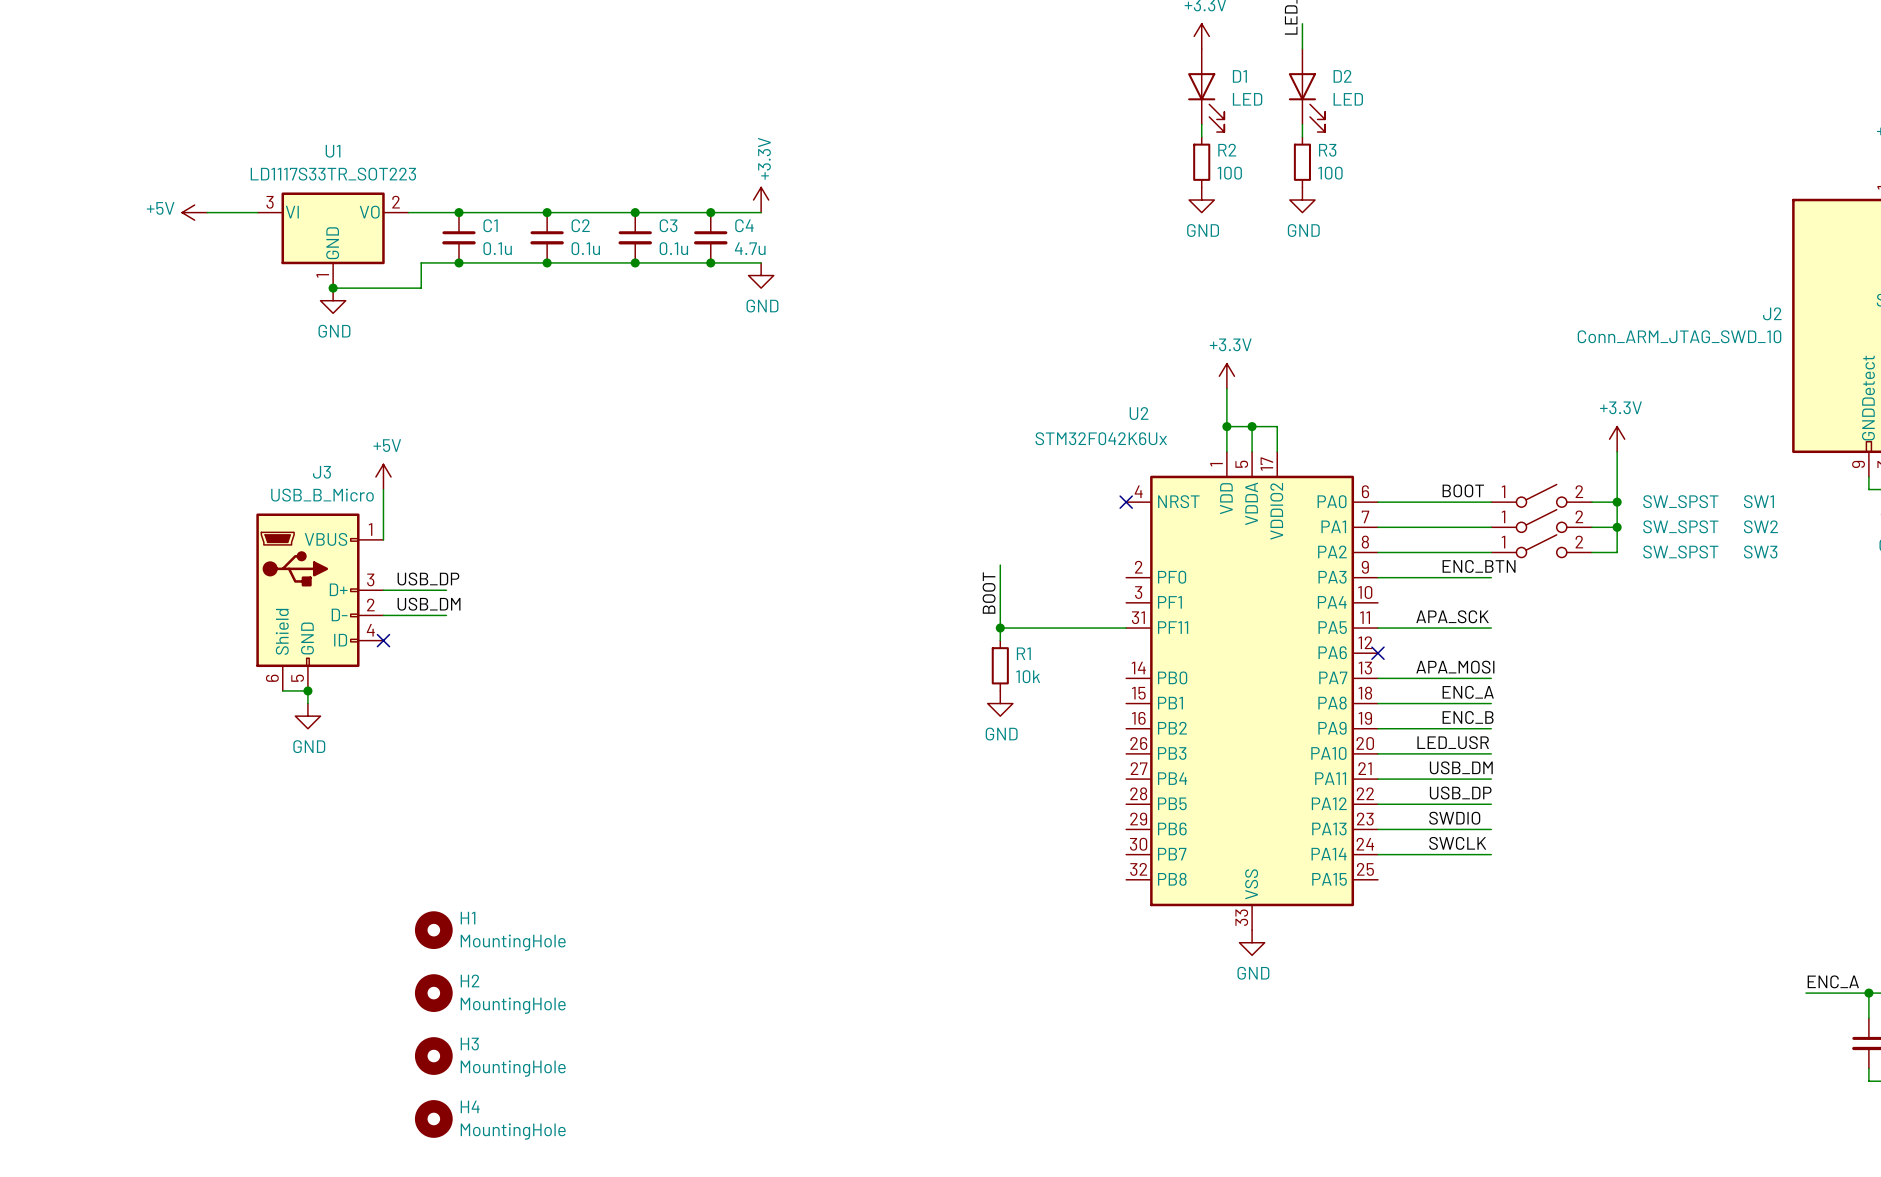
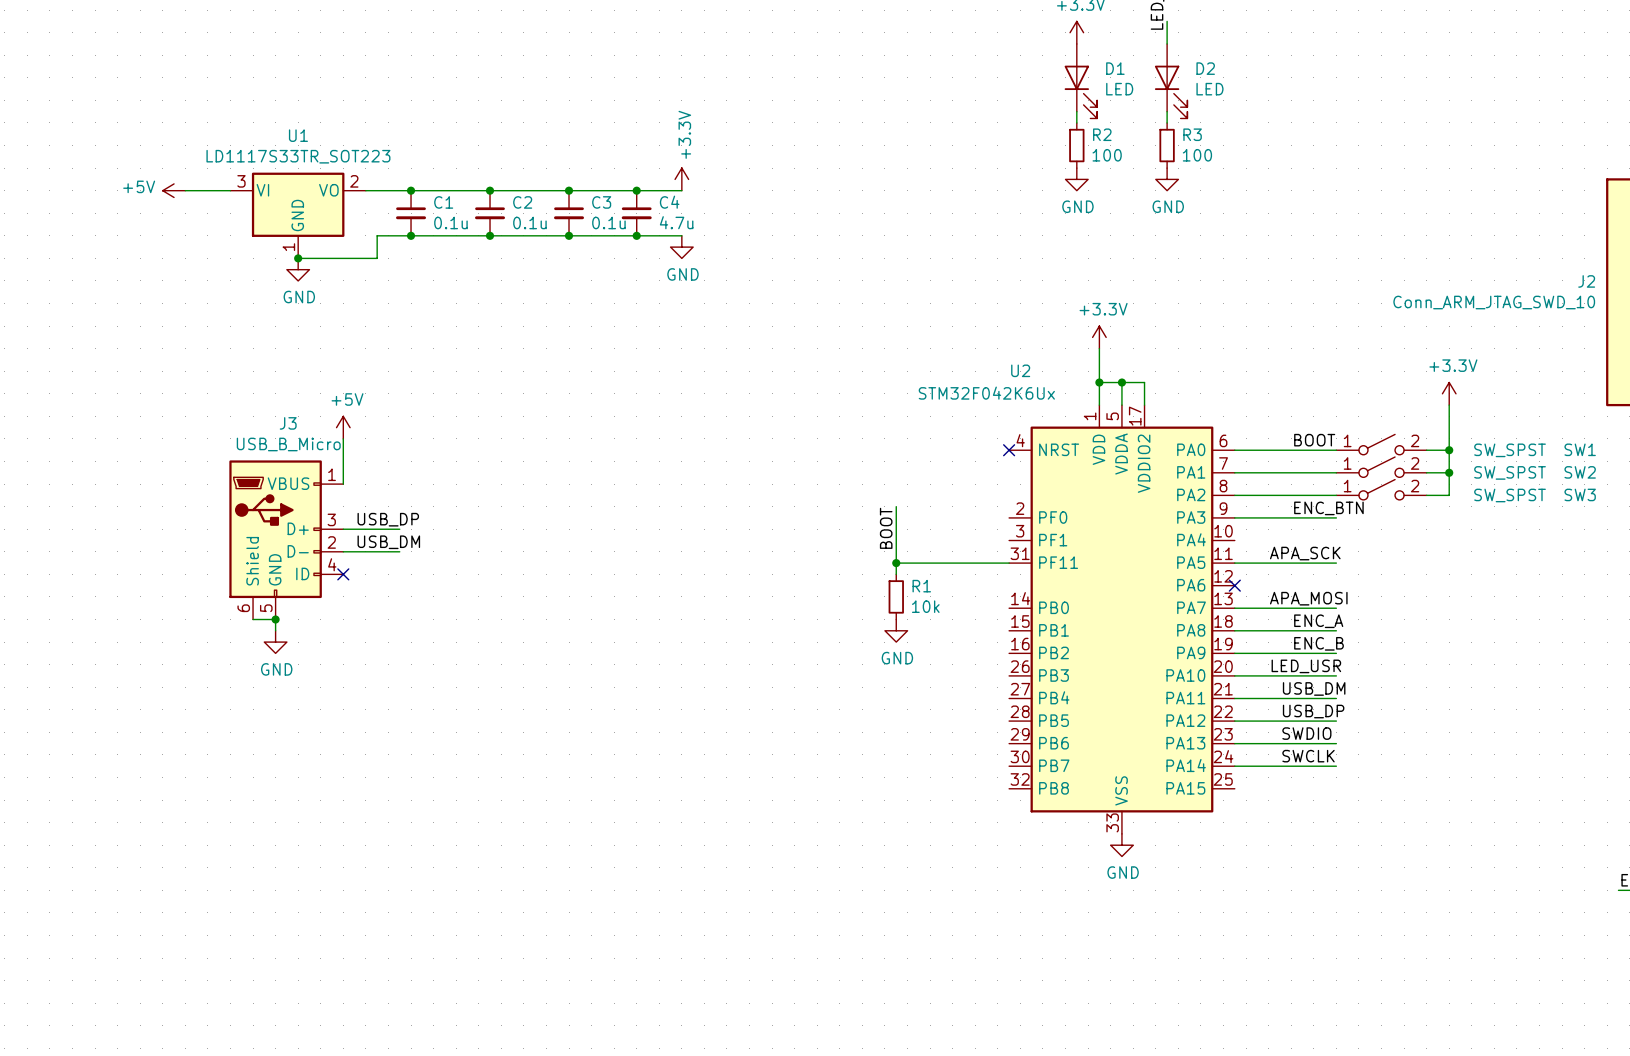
H1: MountingHole (433, 930) -> none
H2: MountingHole (433, 993) -> none
H3: MountingHole (433, 1056) -> none
H4: MountingHole (433, 1118) -> none

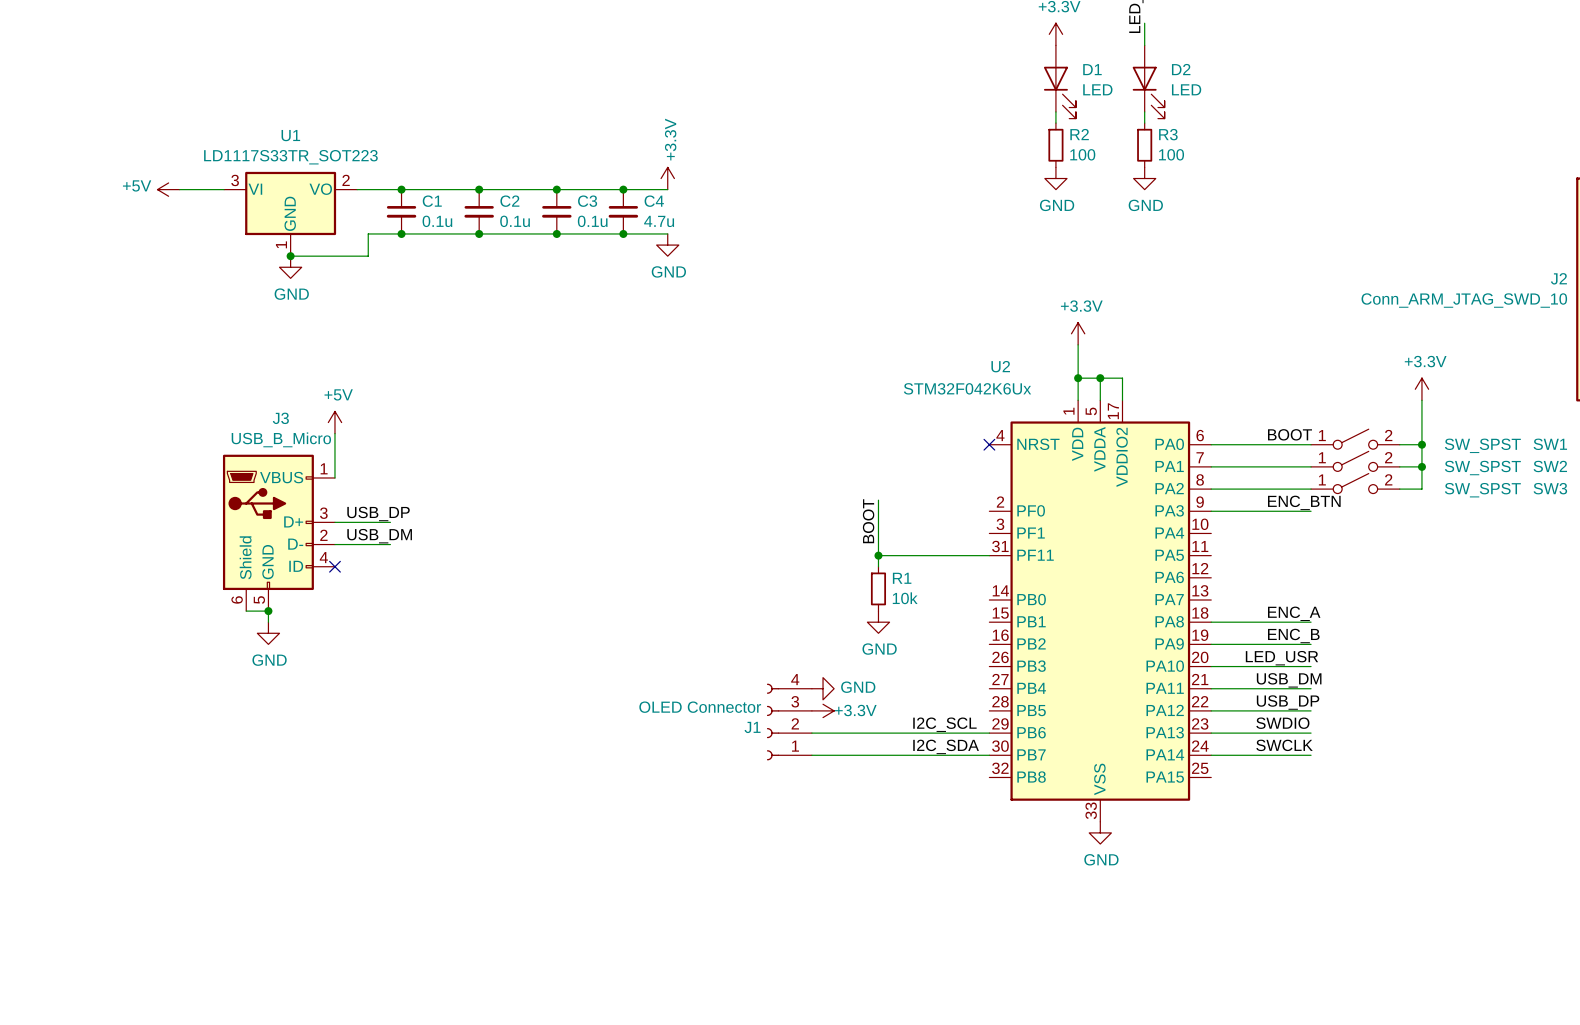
label: APA_SCK (1305, 553) -> none
wire: (1234, 563) (1336, 563) -> none
no-connect mark: (1234, 585) -> none
label: APA_MOSI (1308, 598) -> none
wire: (1234, 608) (1336, 608) -> none
power symbol: none -> GND (823, 688)
power symbol: none -> +3.3V (823, 710)
J1: none -> OLED Connector (789, 722)
label: none -> I2C_SCL (944, 724)
wire: none -> (811, 733) (989, 733)
label: none -> I2C_SDA (946, 746)
wire: none -> (811, 755) (989, 755)

